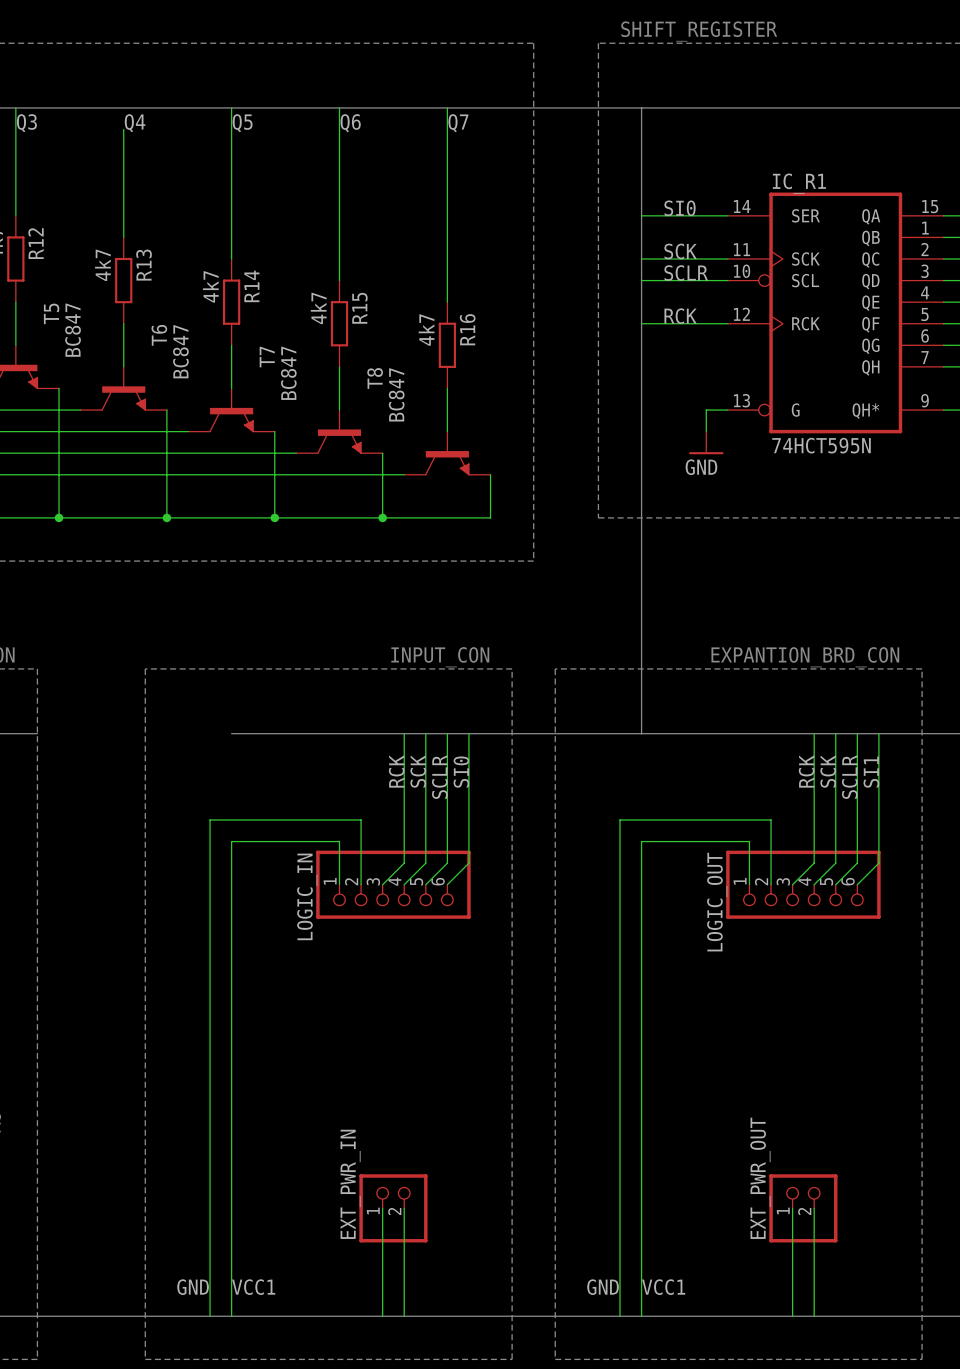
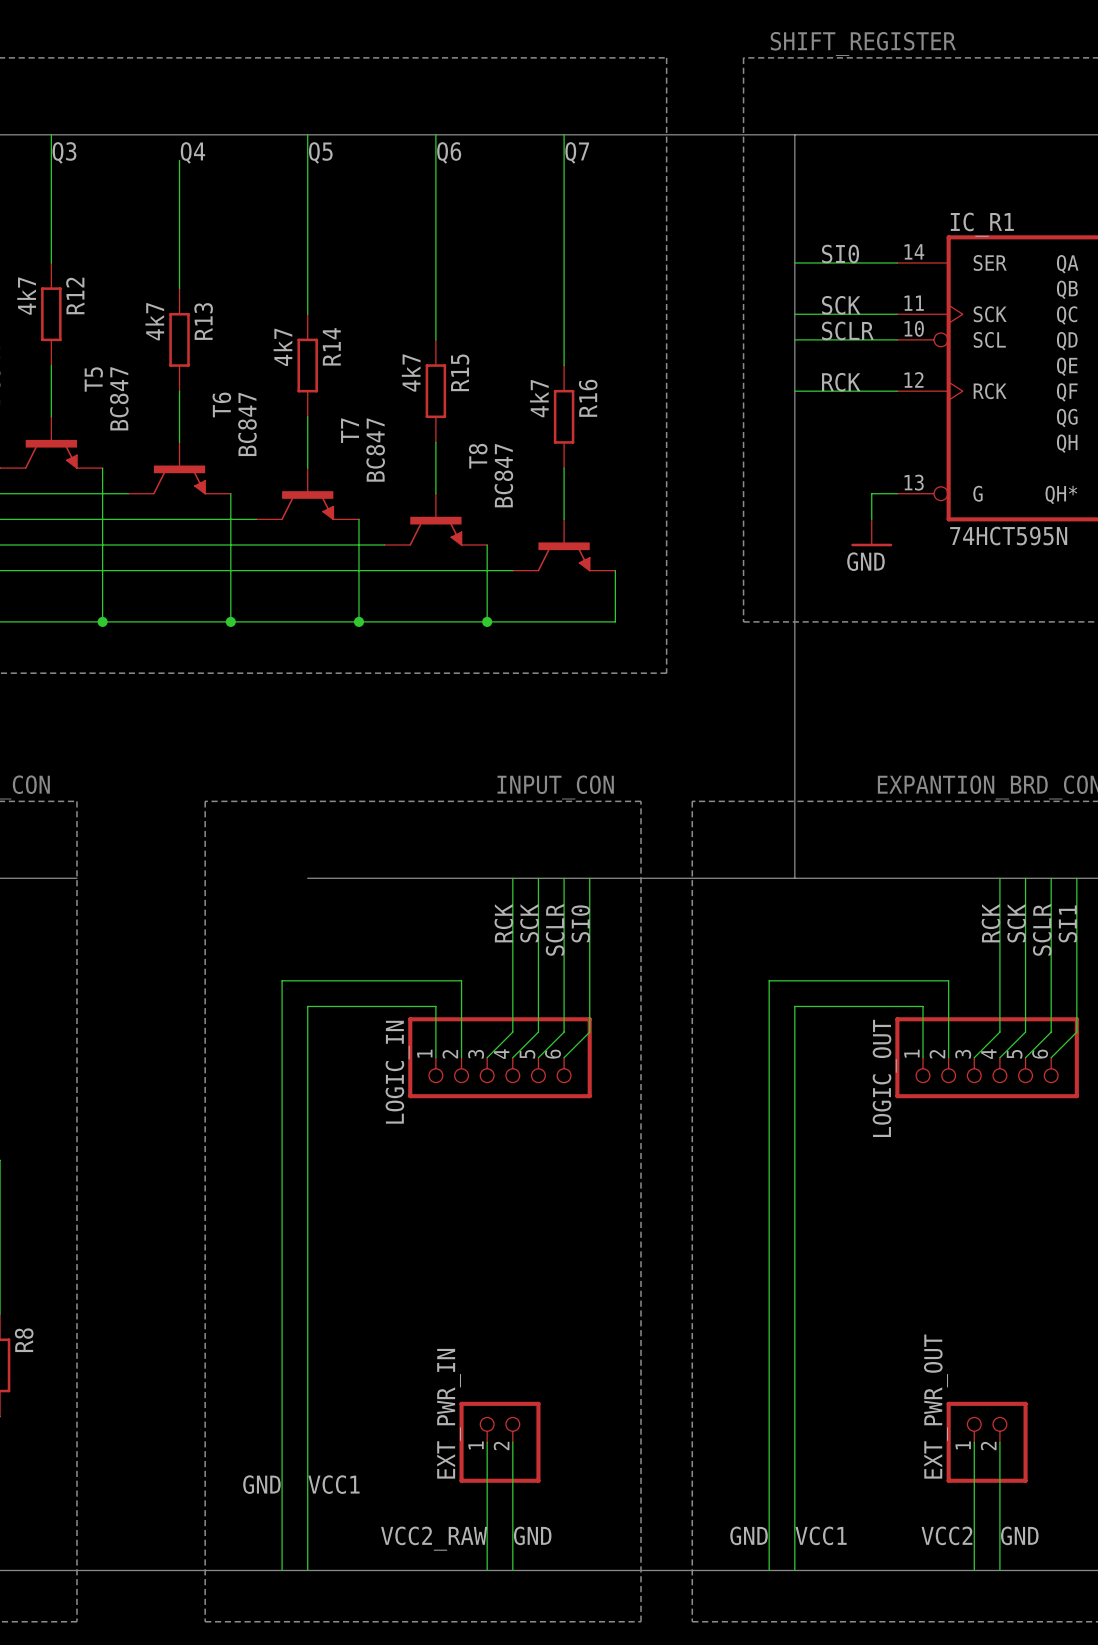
label position: GND (193, 1287) -> GND (261, 1484)
label position: VCC1 (253, 1287) -> VCC1 (333, 1484)
label: none -> GND (532, 1535)
label: none -> VCC2 (946, 1535)
label: none -> GND (1019, 1535)
label: none -> VCC2_RAW (434, 1538)

